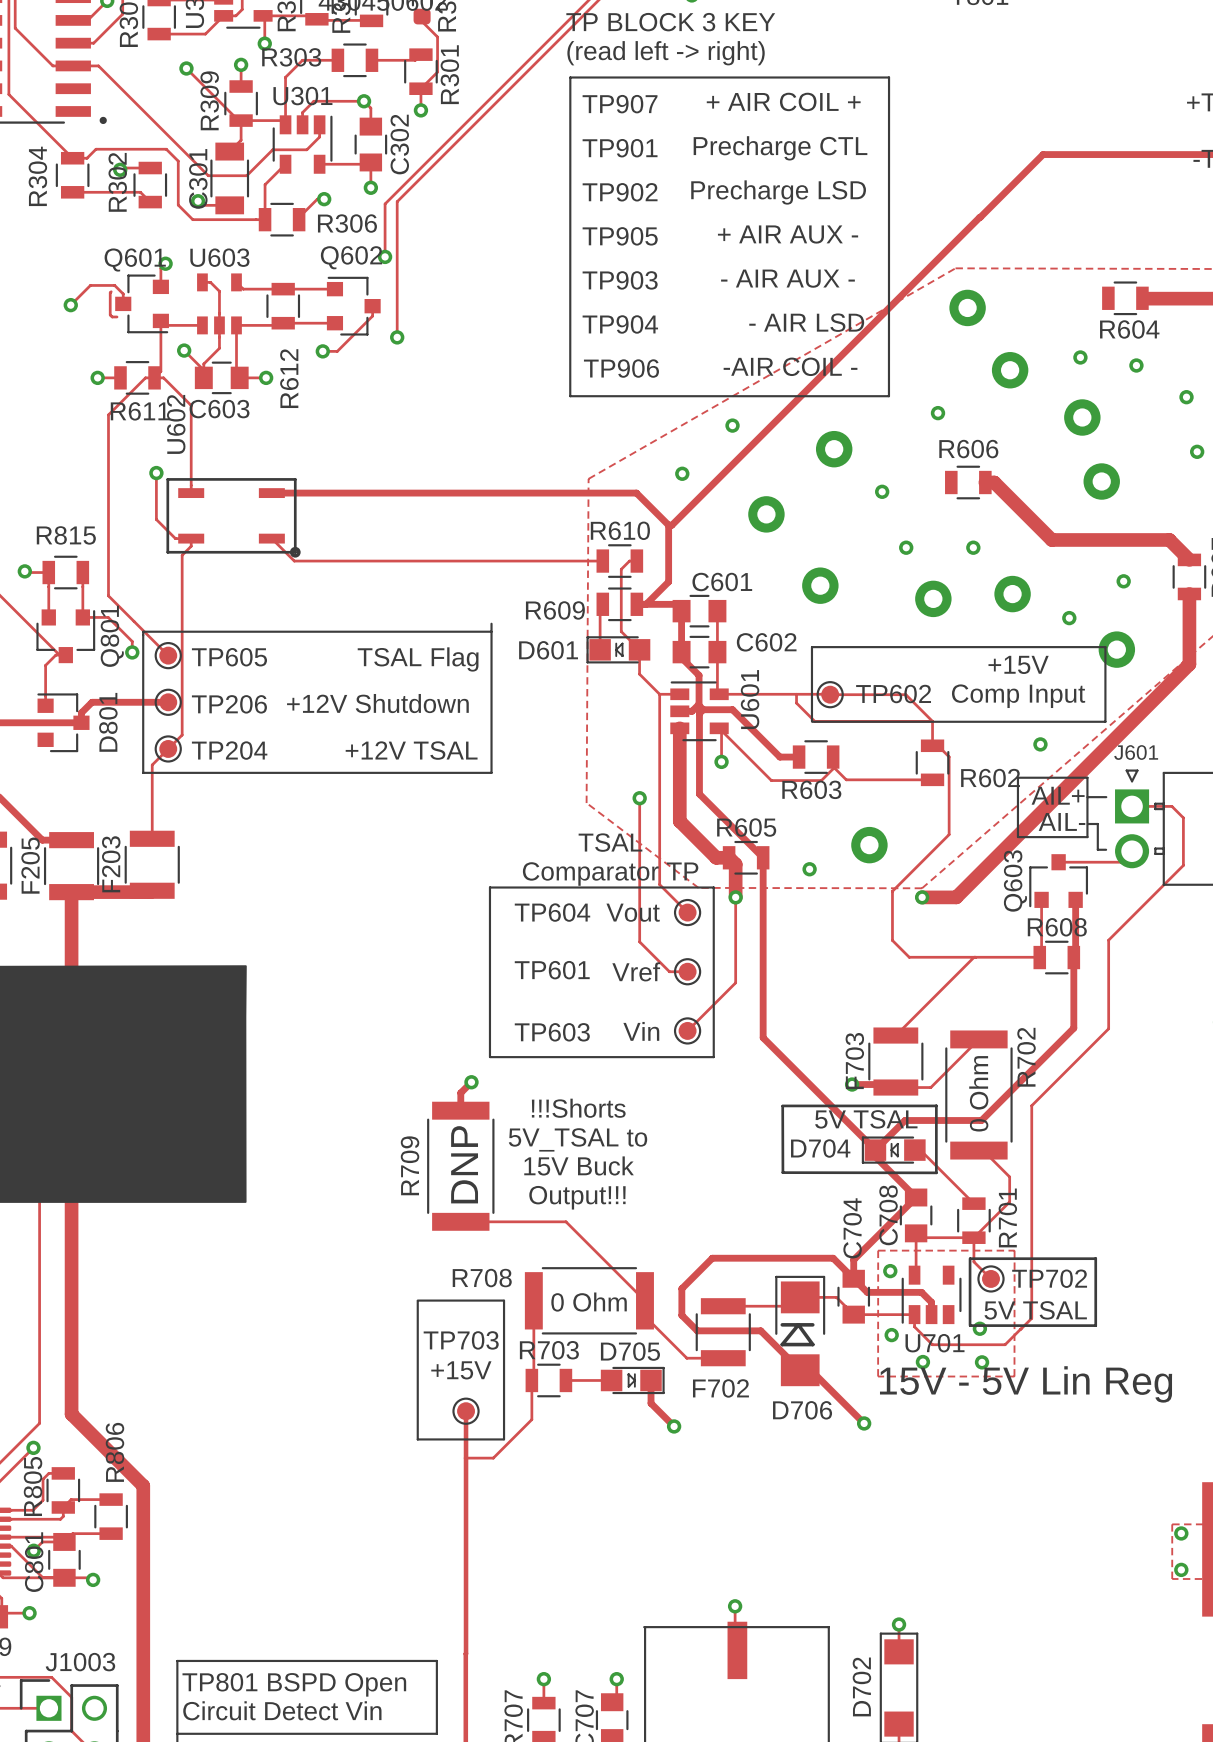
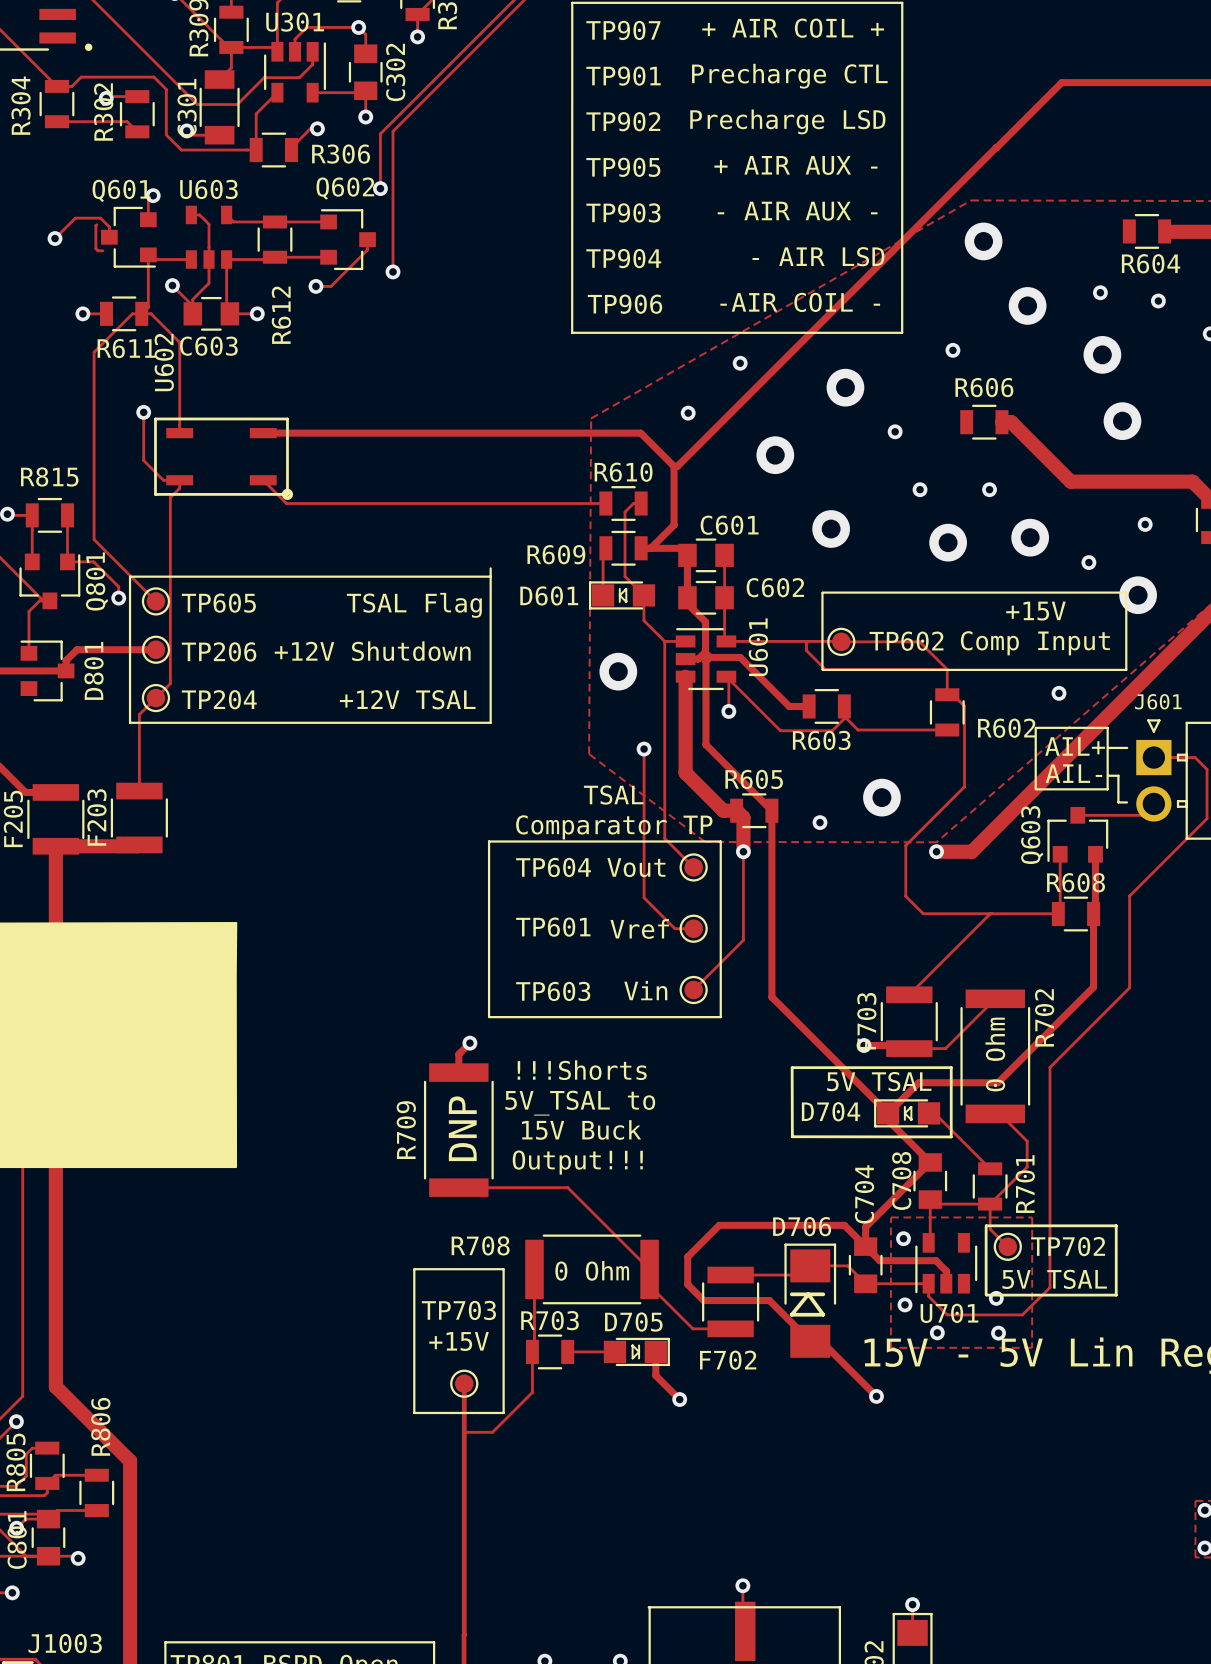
via: none -> (618, 671)
D706 name position: D706 (802, 1410) -> D706 (802, 1226)

